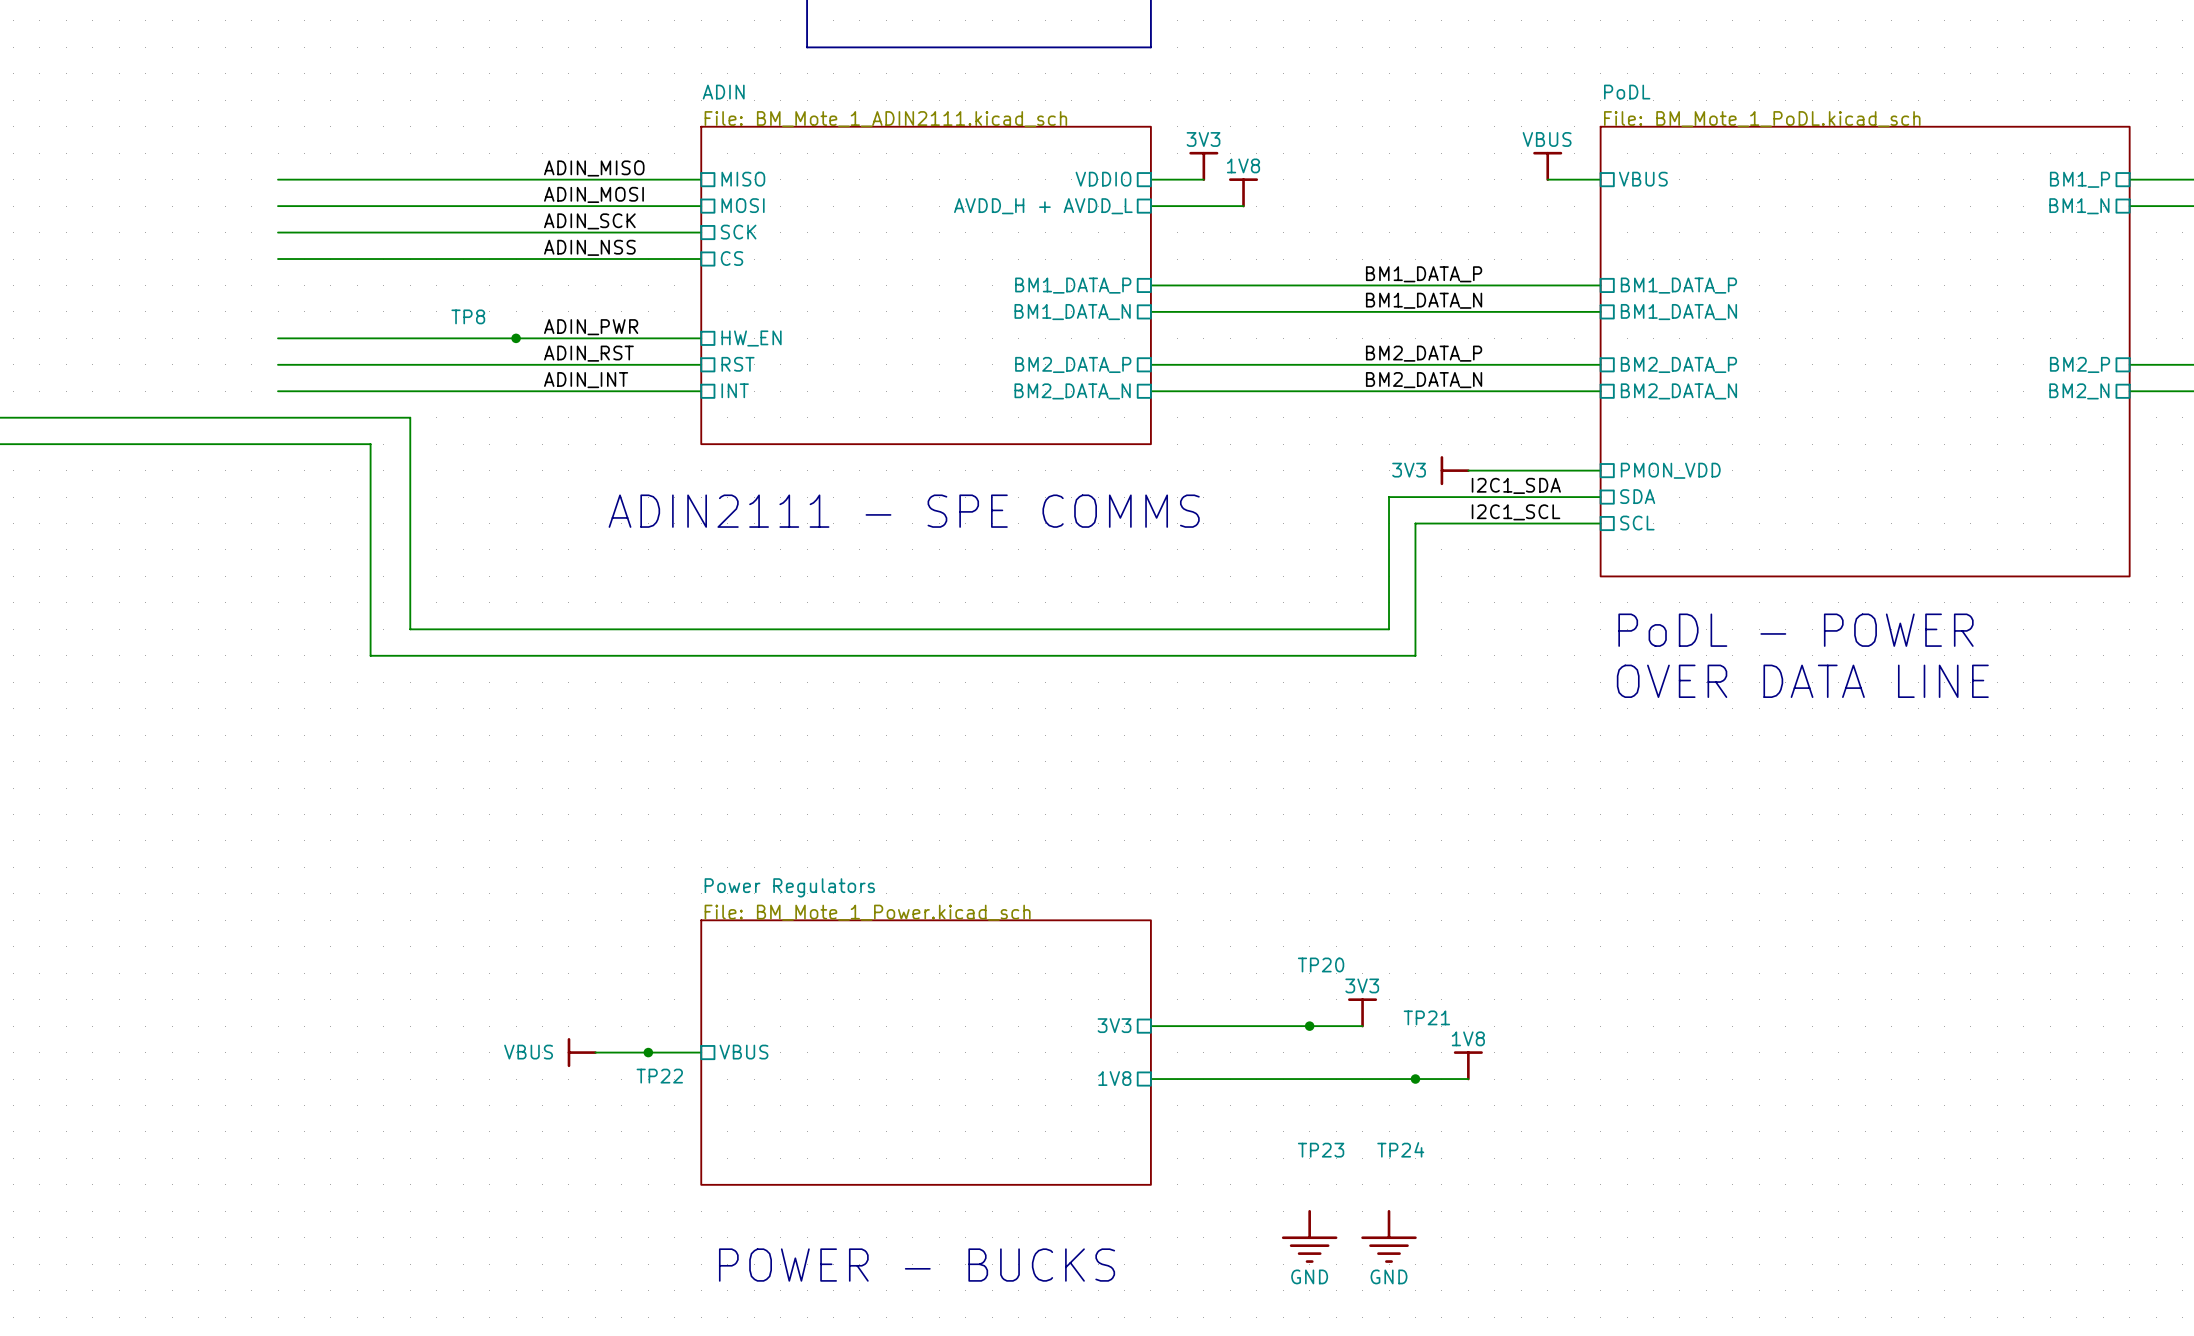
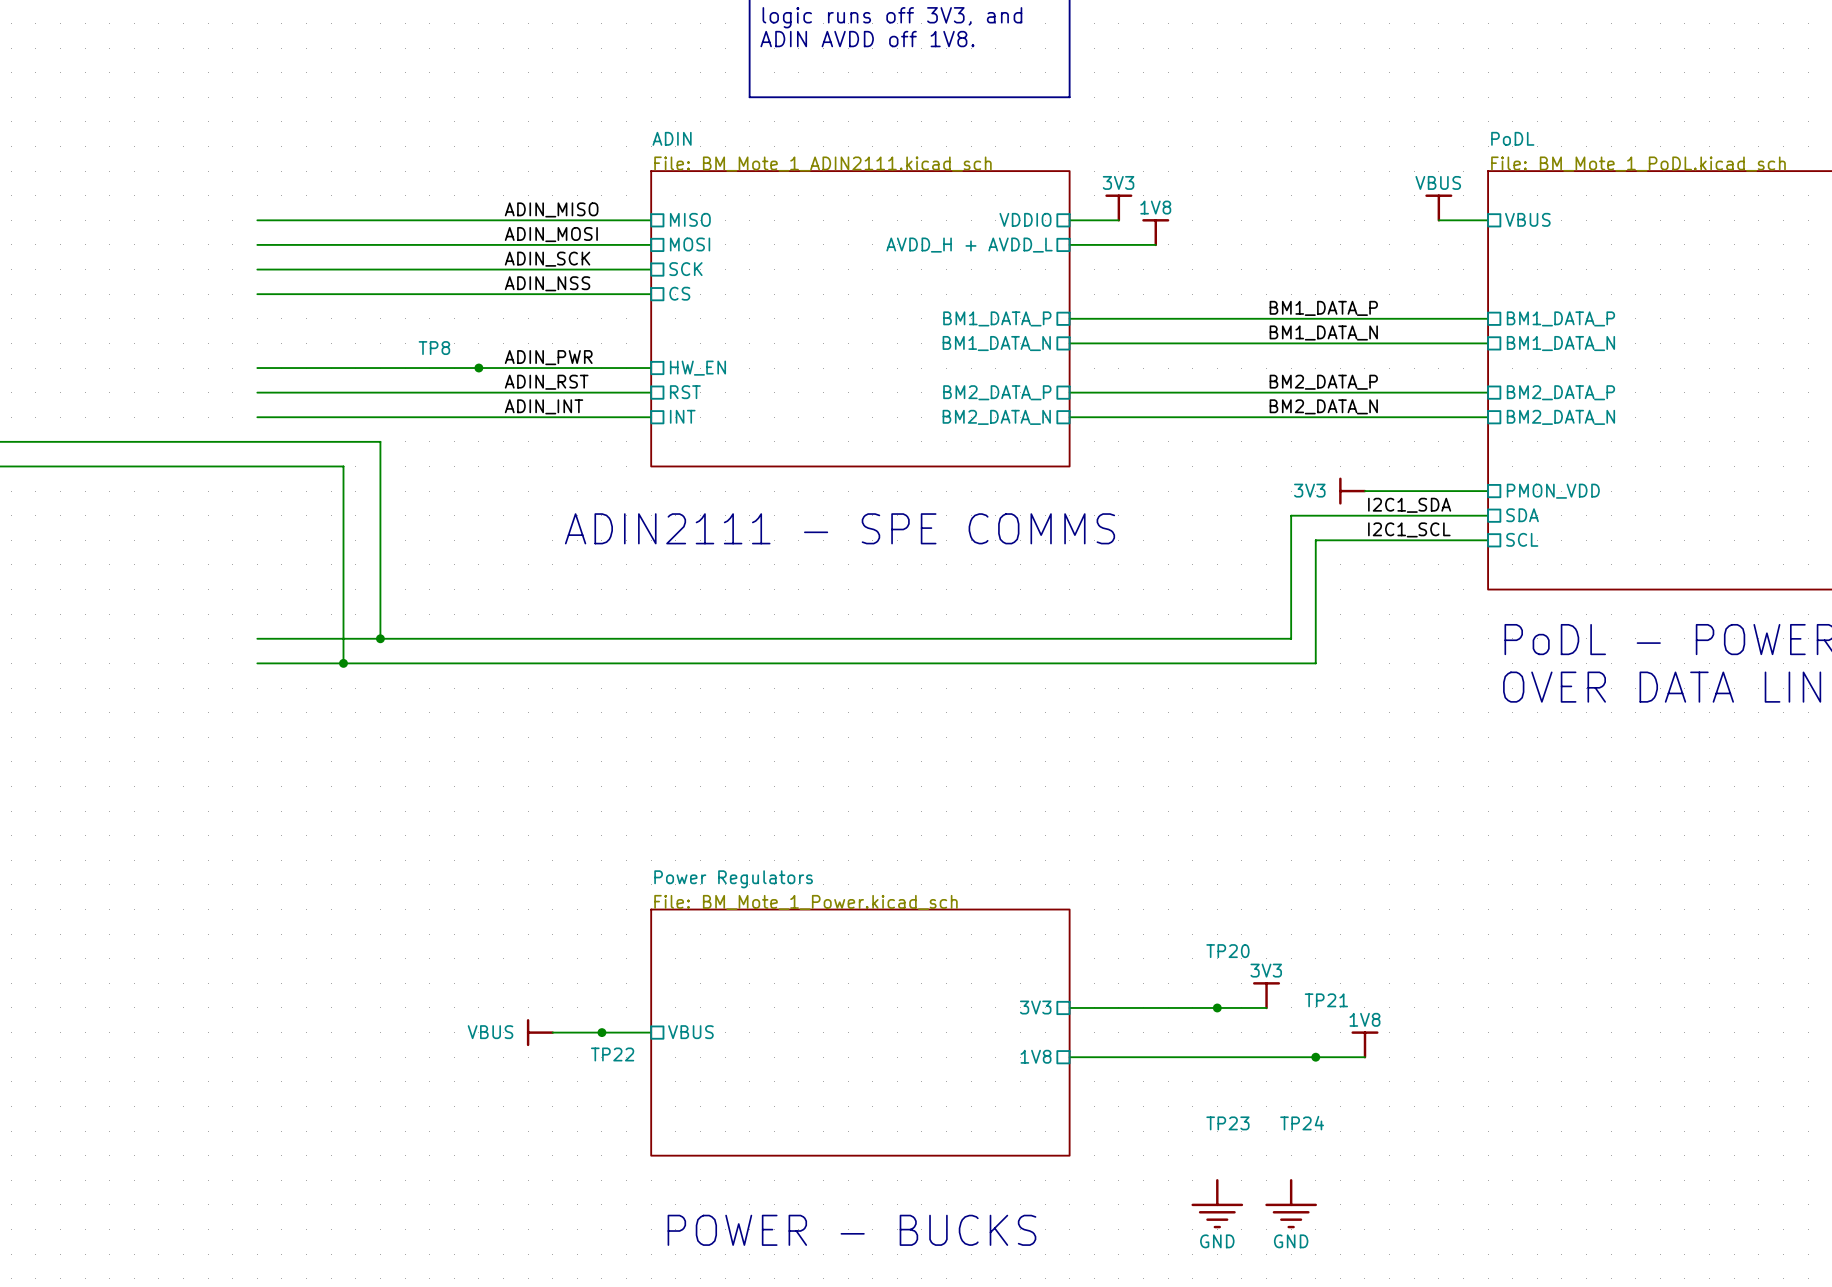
wire: none -> (257, 638) (380, 638)
junction: none -> (380, 638)
wire: none -> (257, 663) (343, 663)
junction: none -> (343, 663)

